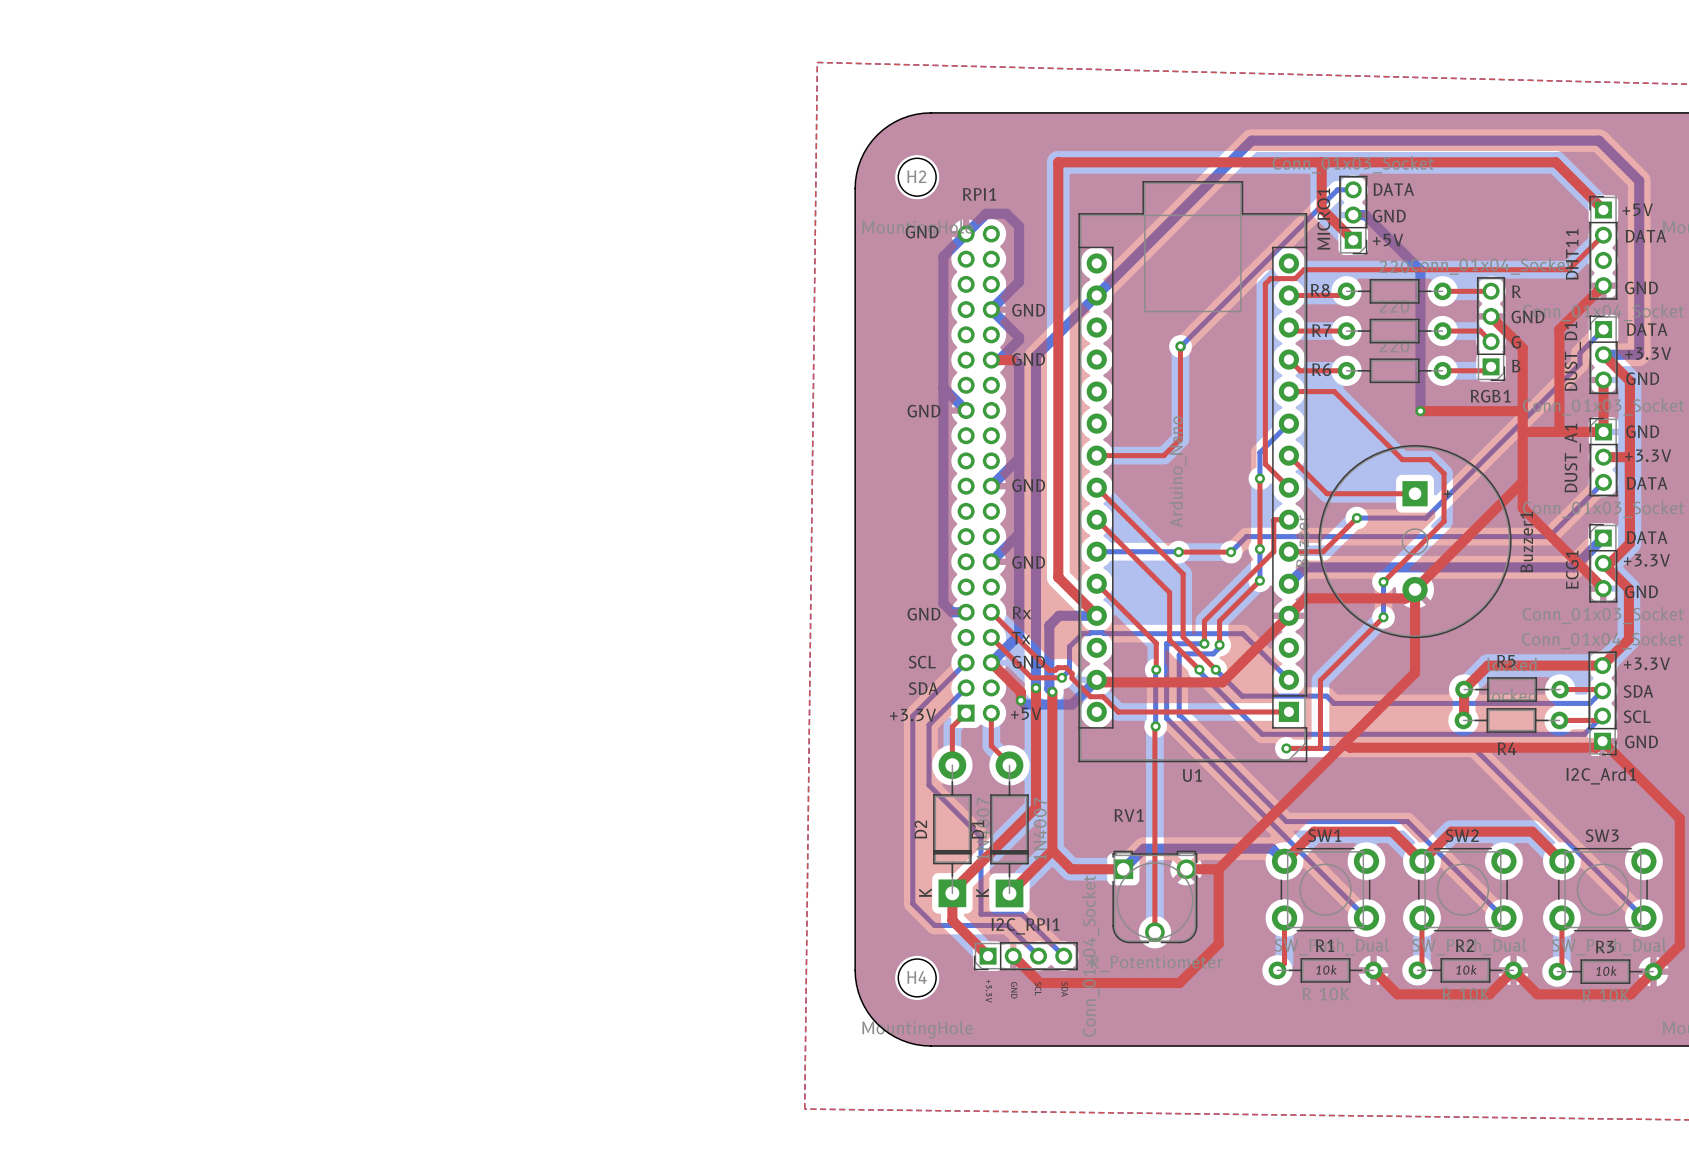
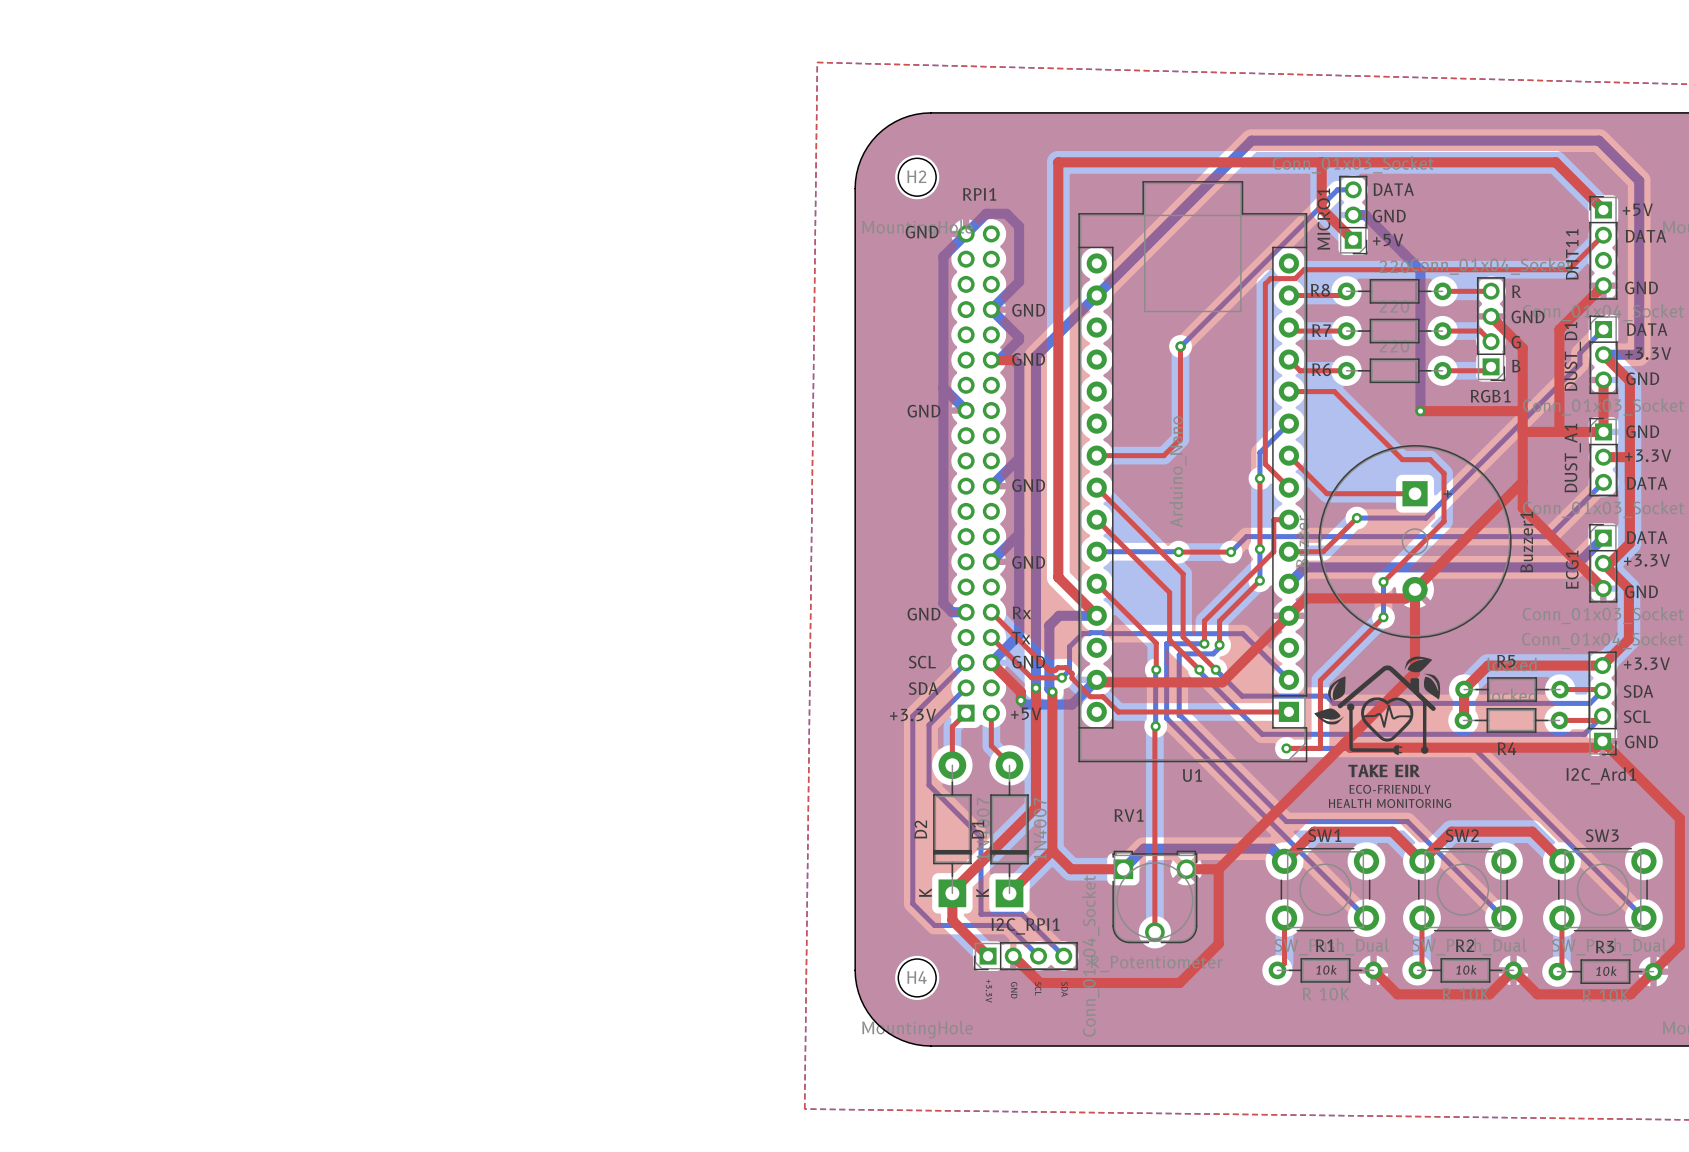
drawing: none -> [1314, 656, 1441, 755]
text: none -> TAKE EIR (1384, 770)
text: none -> ECO-FRIENDLY (1390, 789)
text: none -> HEALTH MONITORING (1389, 803)

